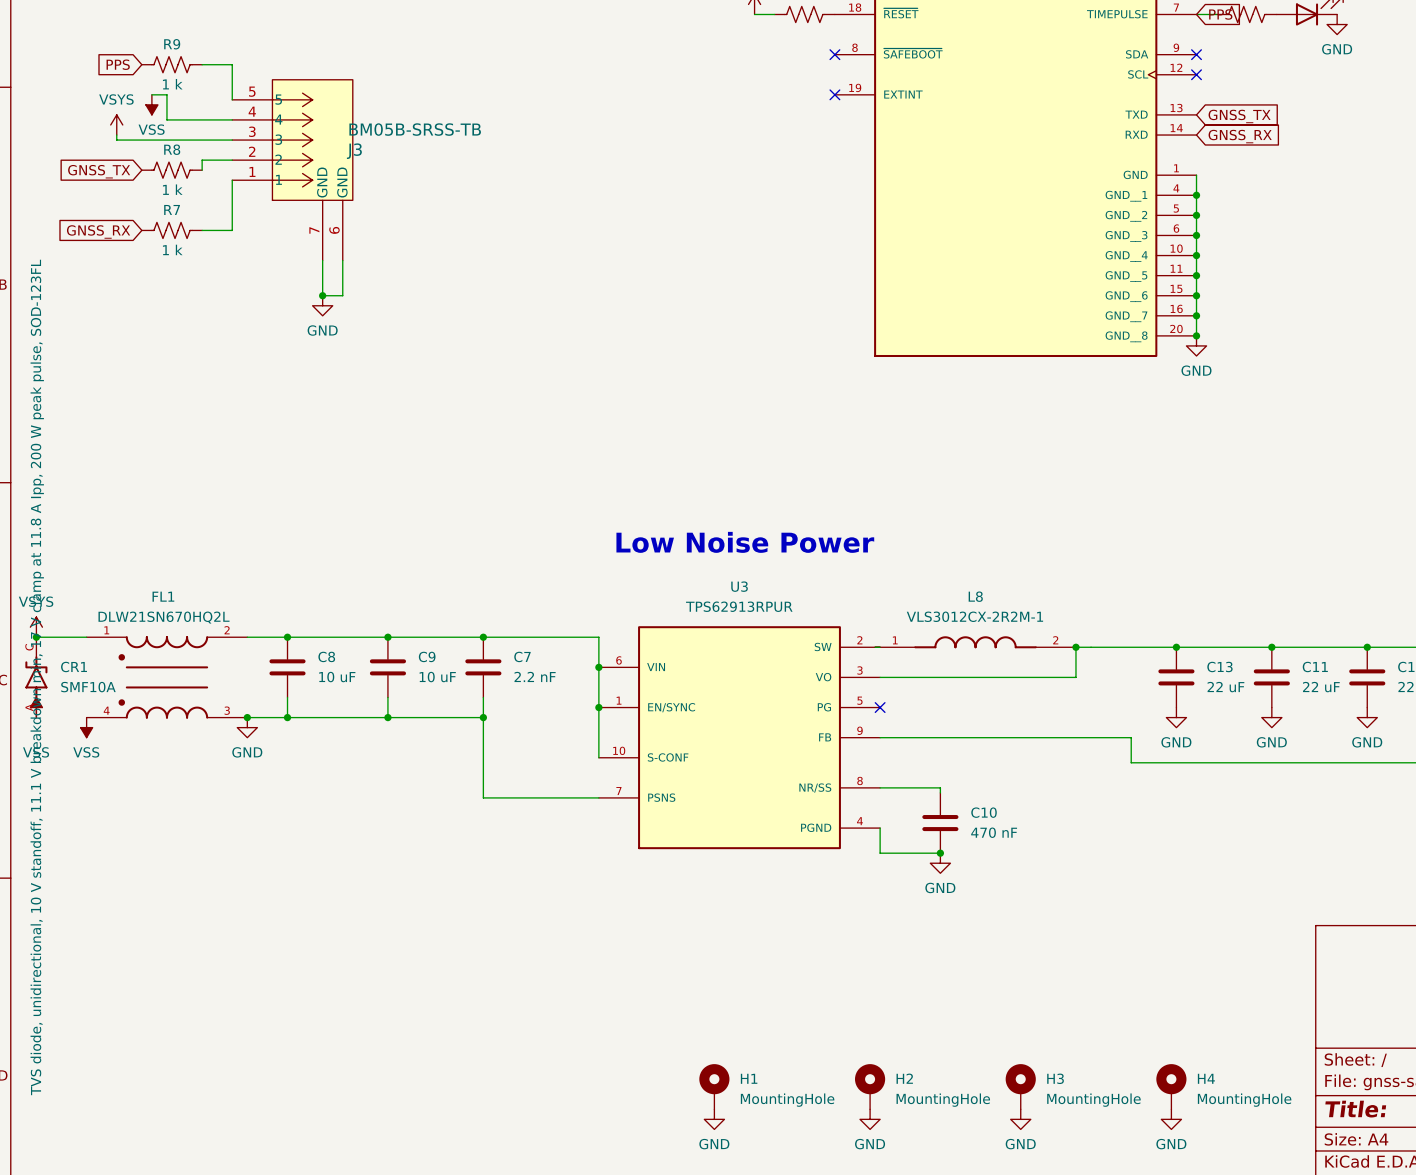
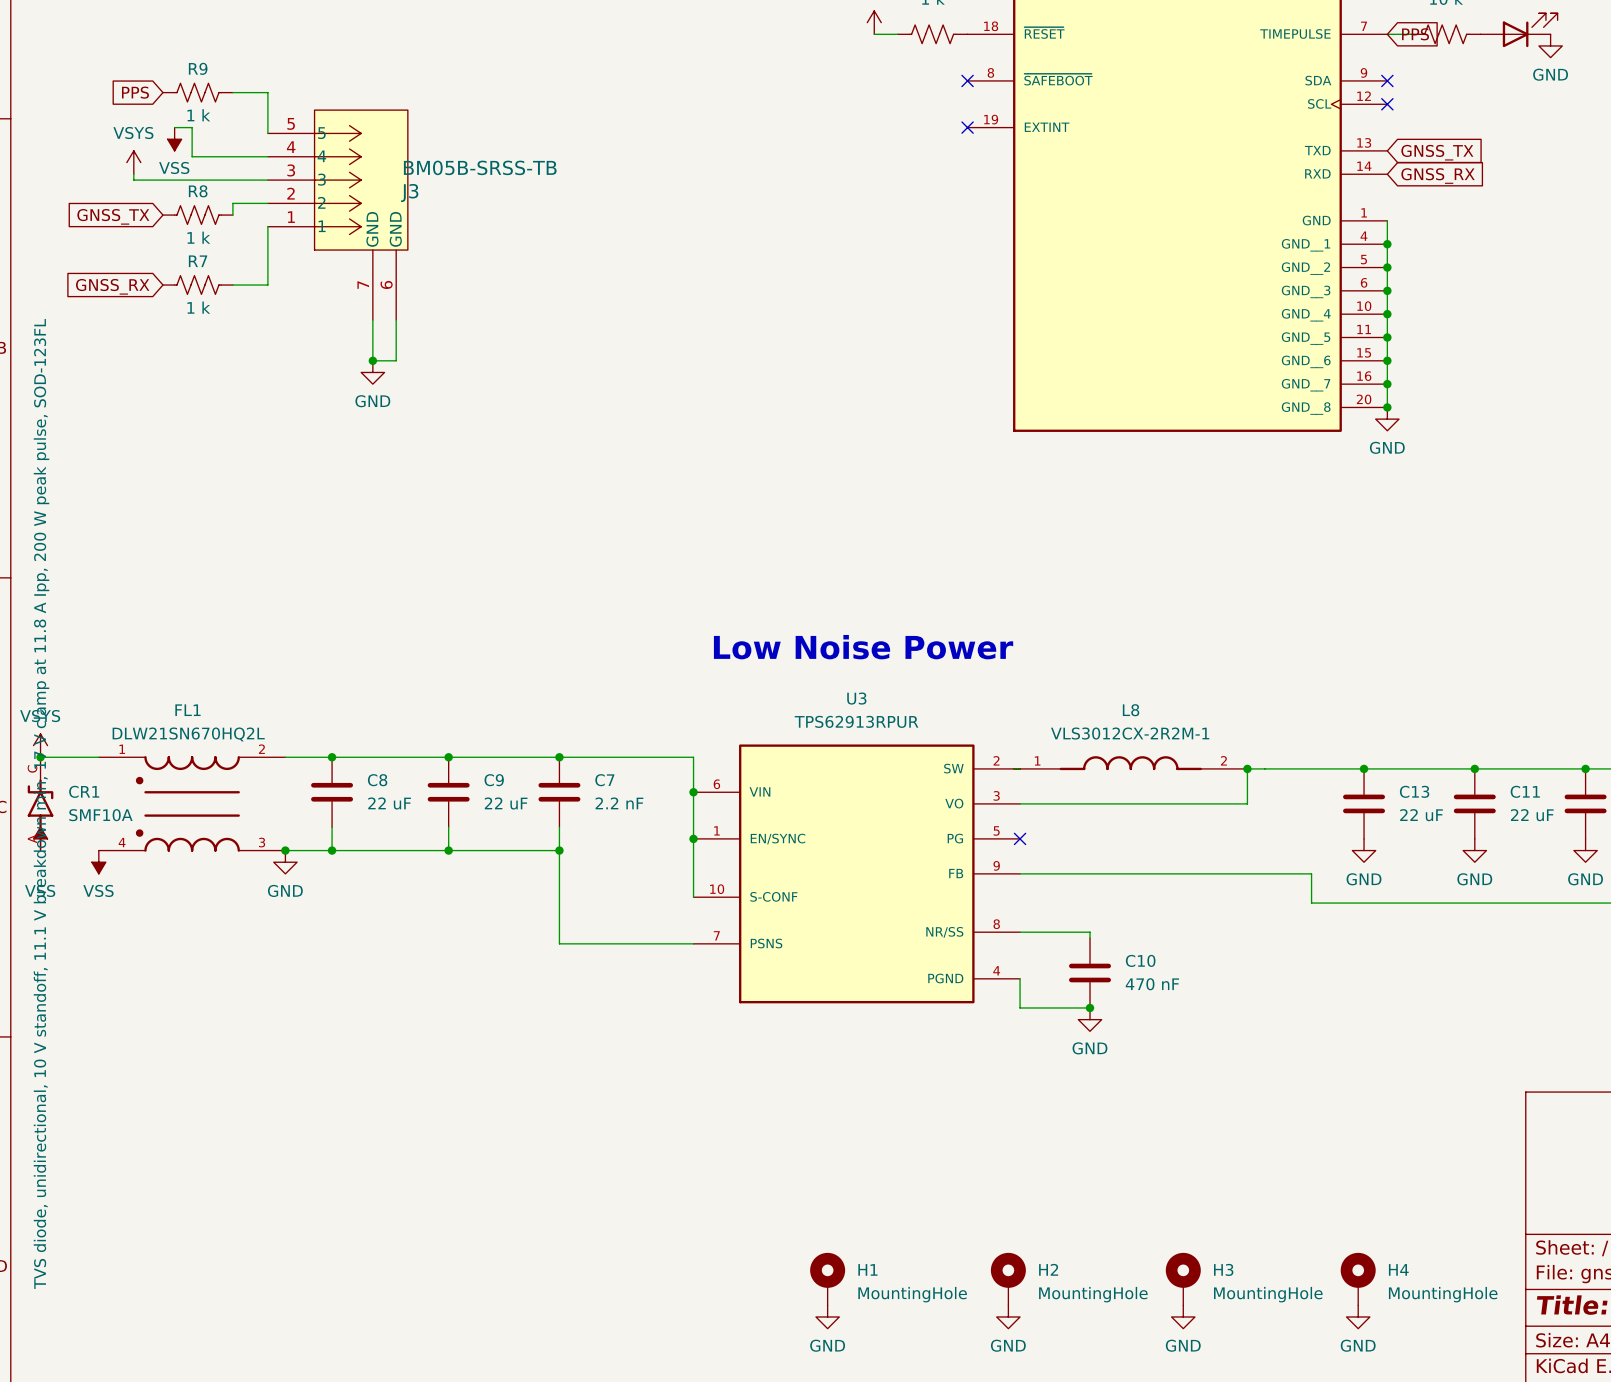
C8 value: 10 uF (337, 677) -> 22 uF (389, 803)
C9 value: 10 uF (437, 677) -> 22 uF (506, 803)

